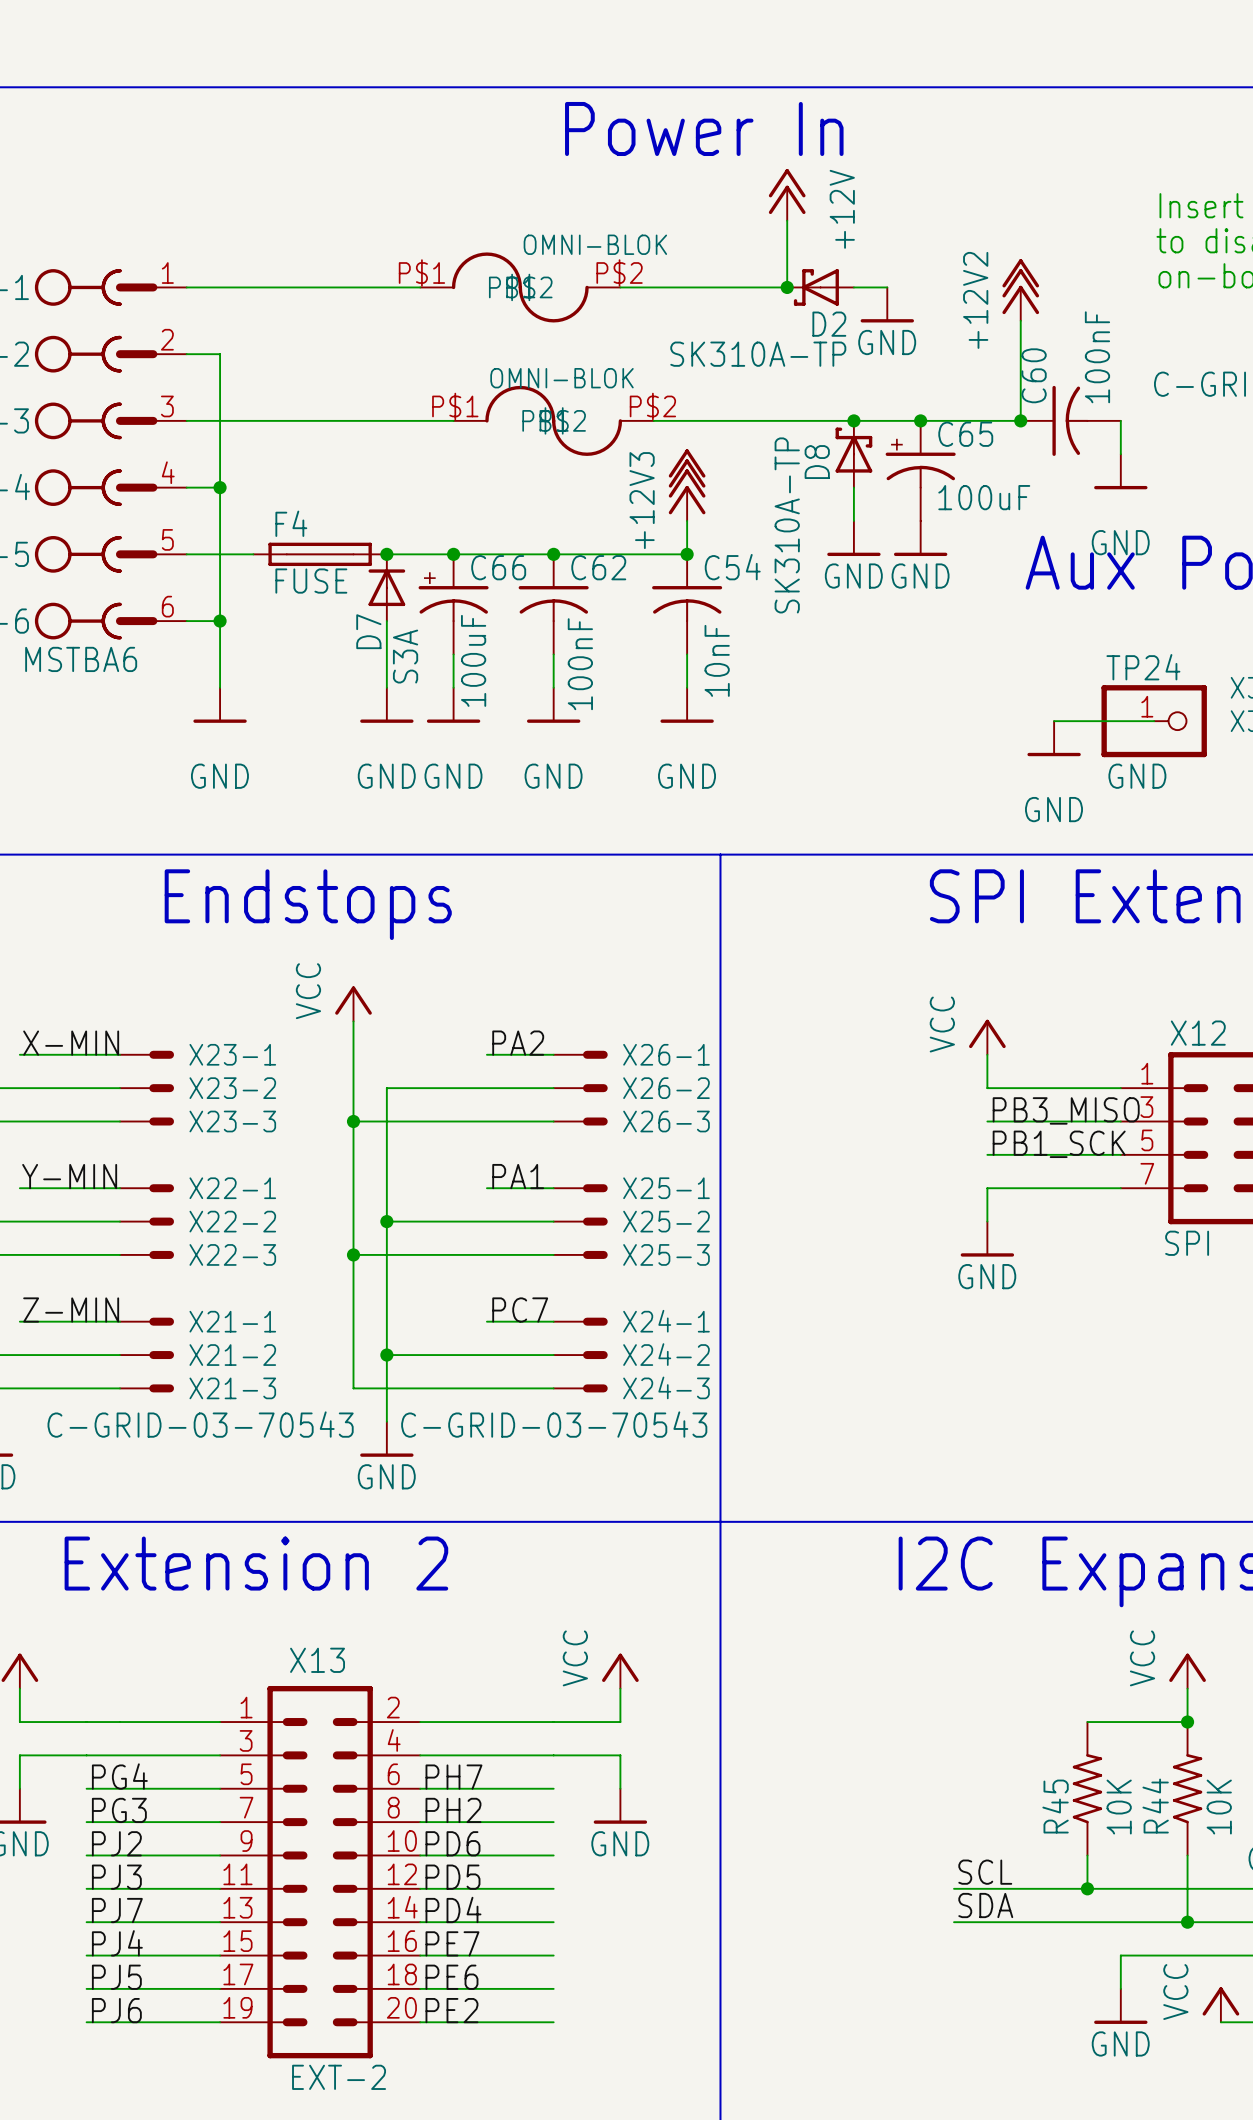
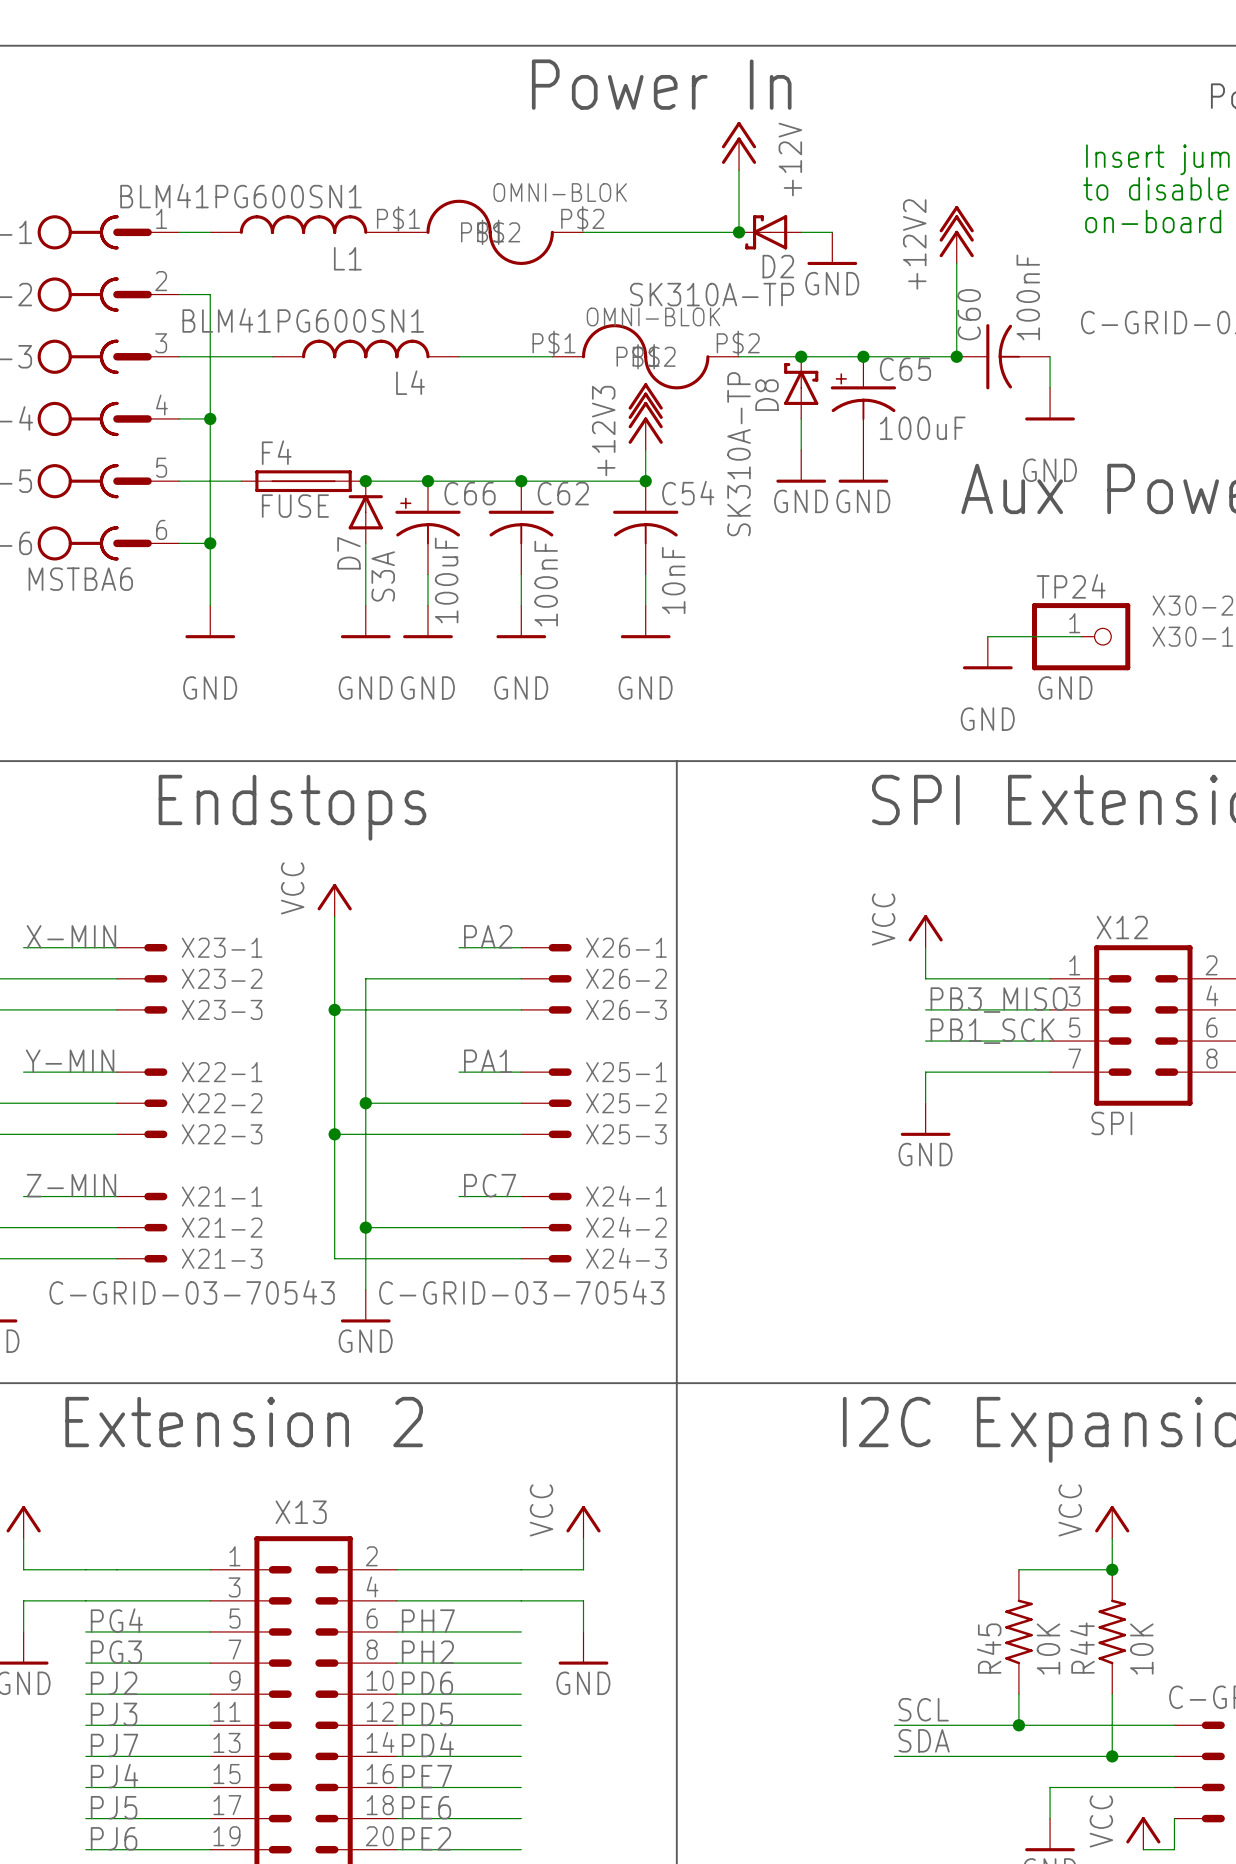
L1: none -> BLM41PG600SN1 (303, 224)
wire: (220, 287) (420, 287) -> none
L4: none -> BLM41PG600SN1 (365, 348)
wire: (286, 420) (453, 420) -> none
wire: none -> (459, 356) (552, 356)
part position: (553, 420) -> (645, 356)
wire: (653, 420) (787, 420) -> none

